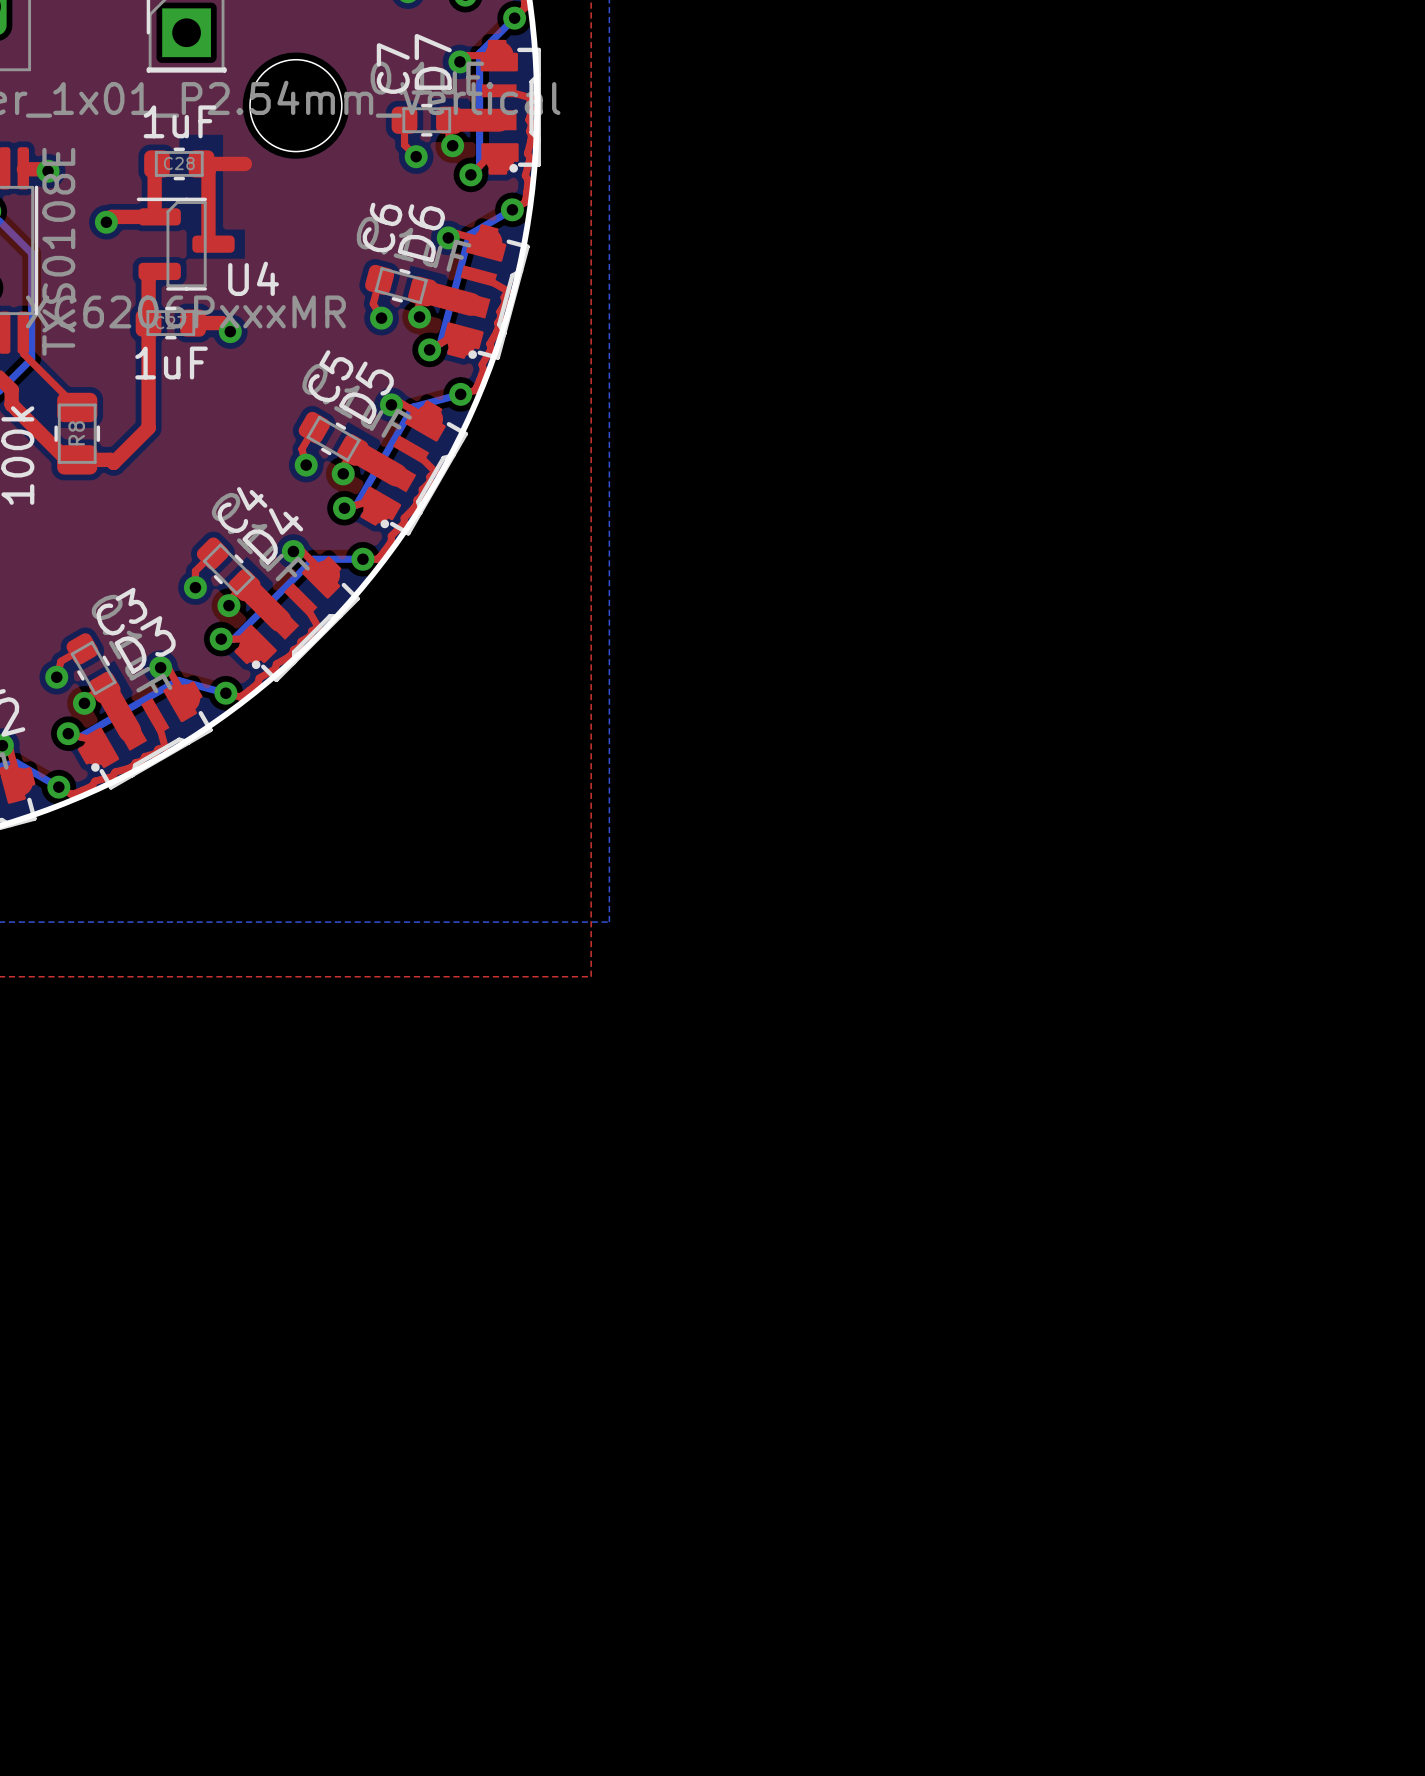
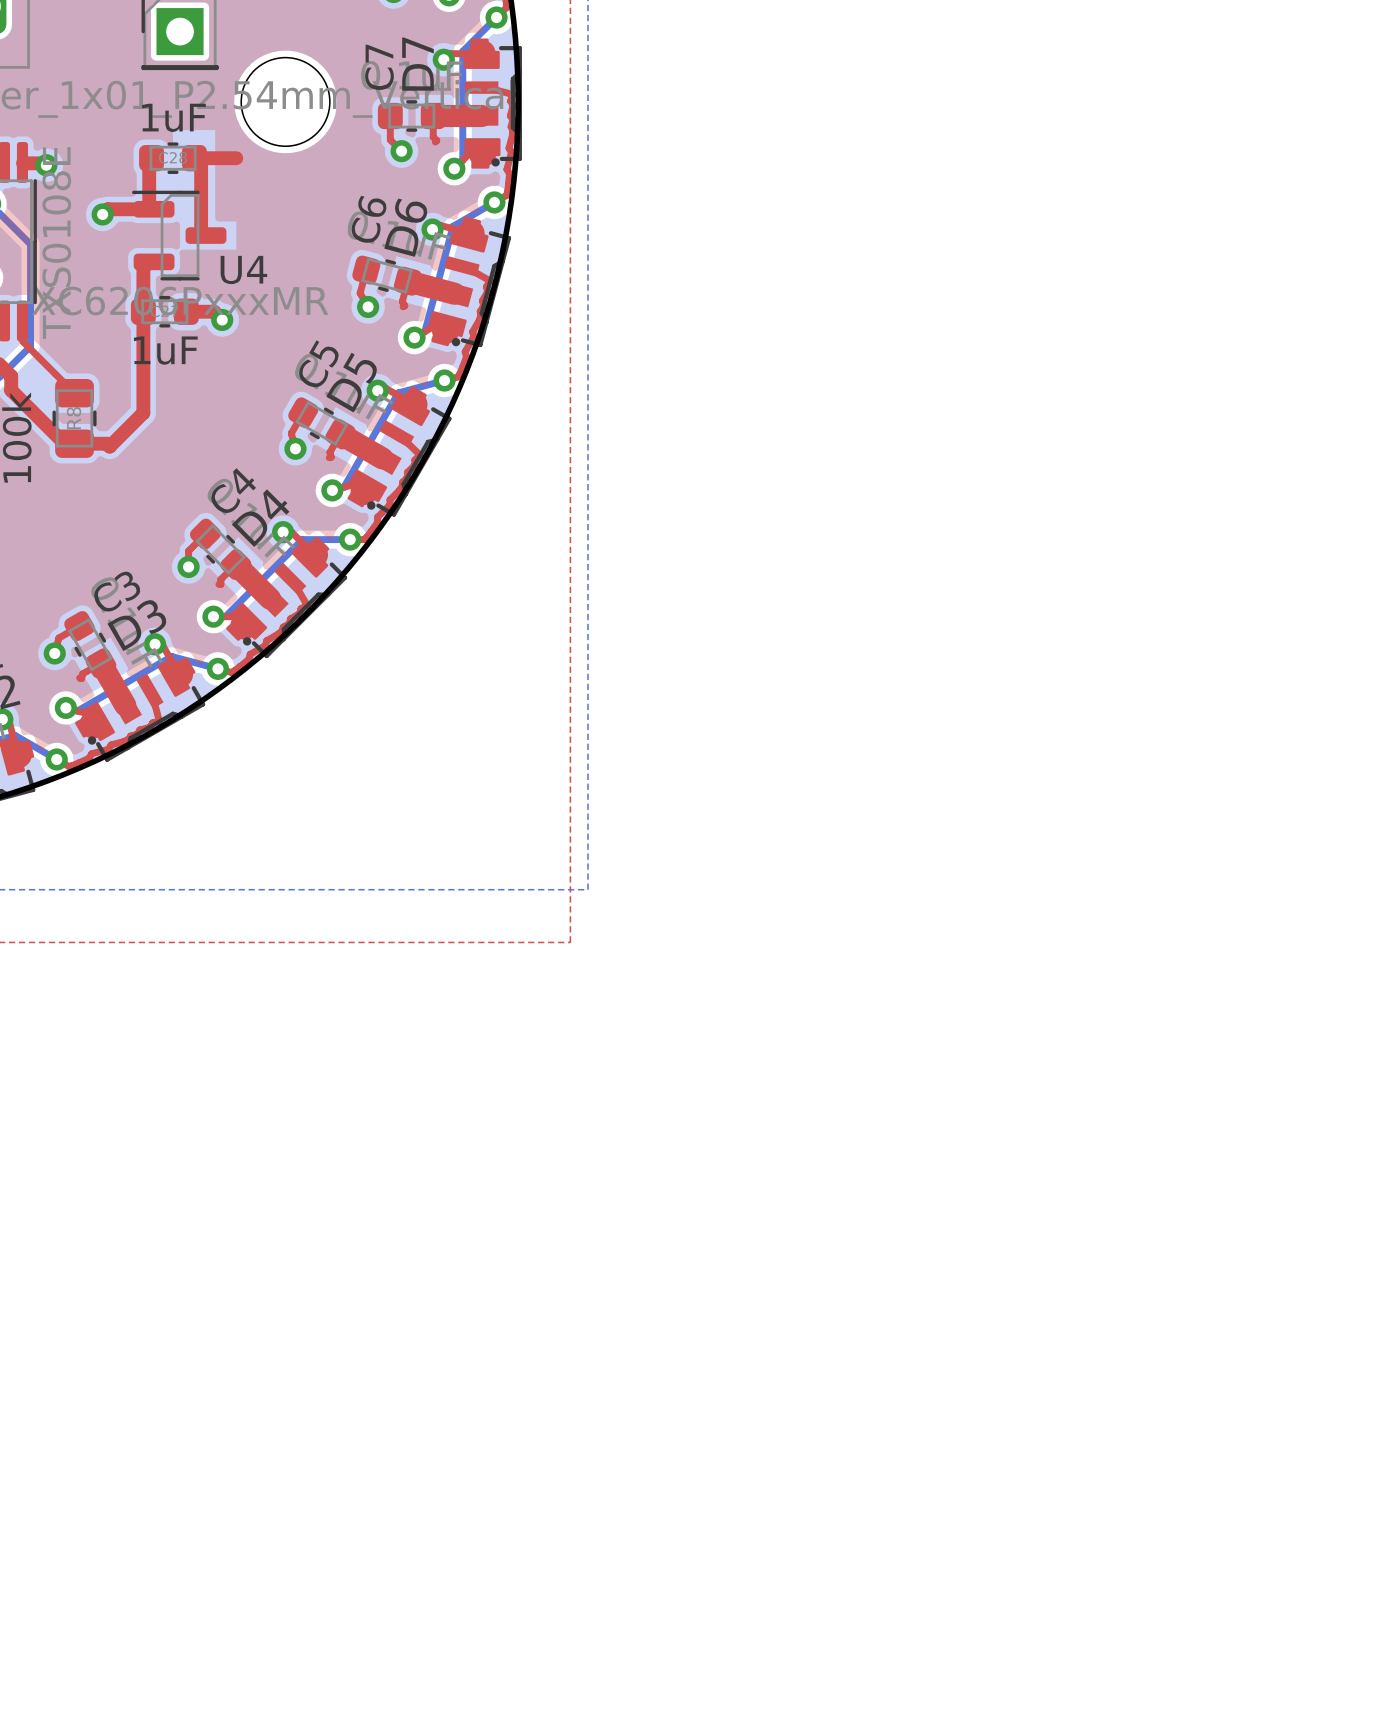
via: (452, 145) -> none
via: (419, 317) -> none
via: (343, 473) -> none
via: (228, 605) -> none
via: (84, 703) -> none

